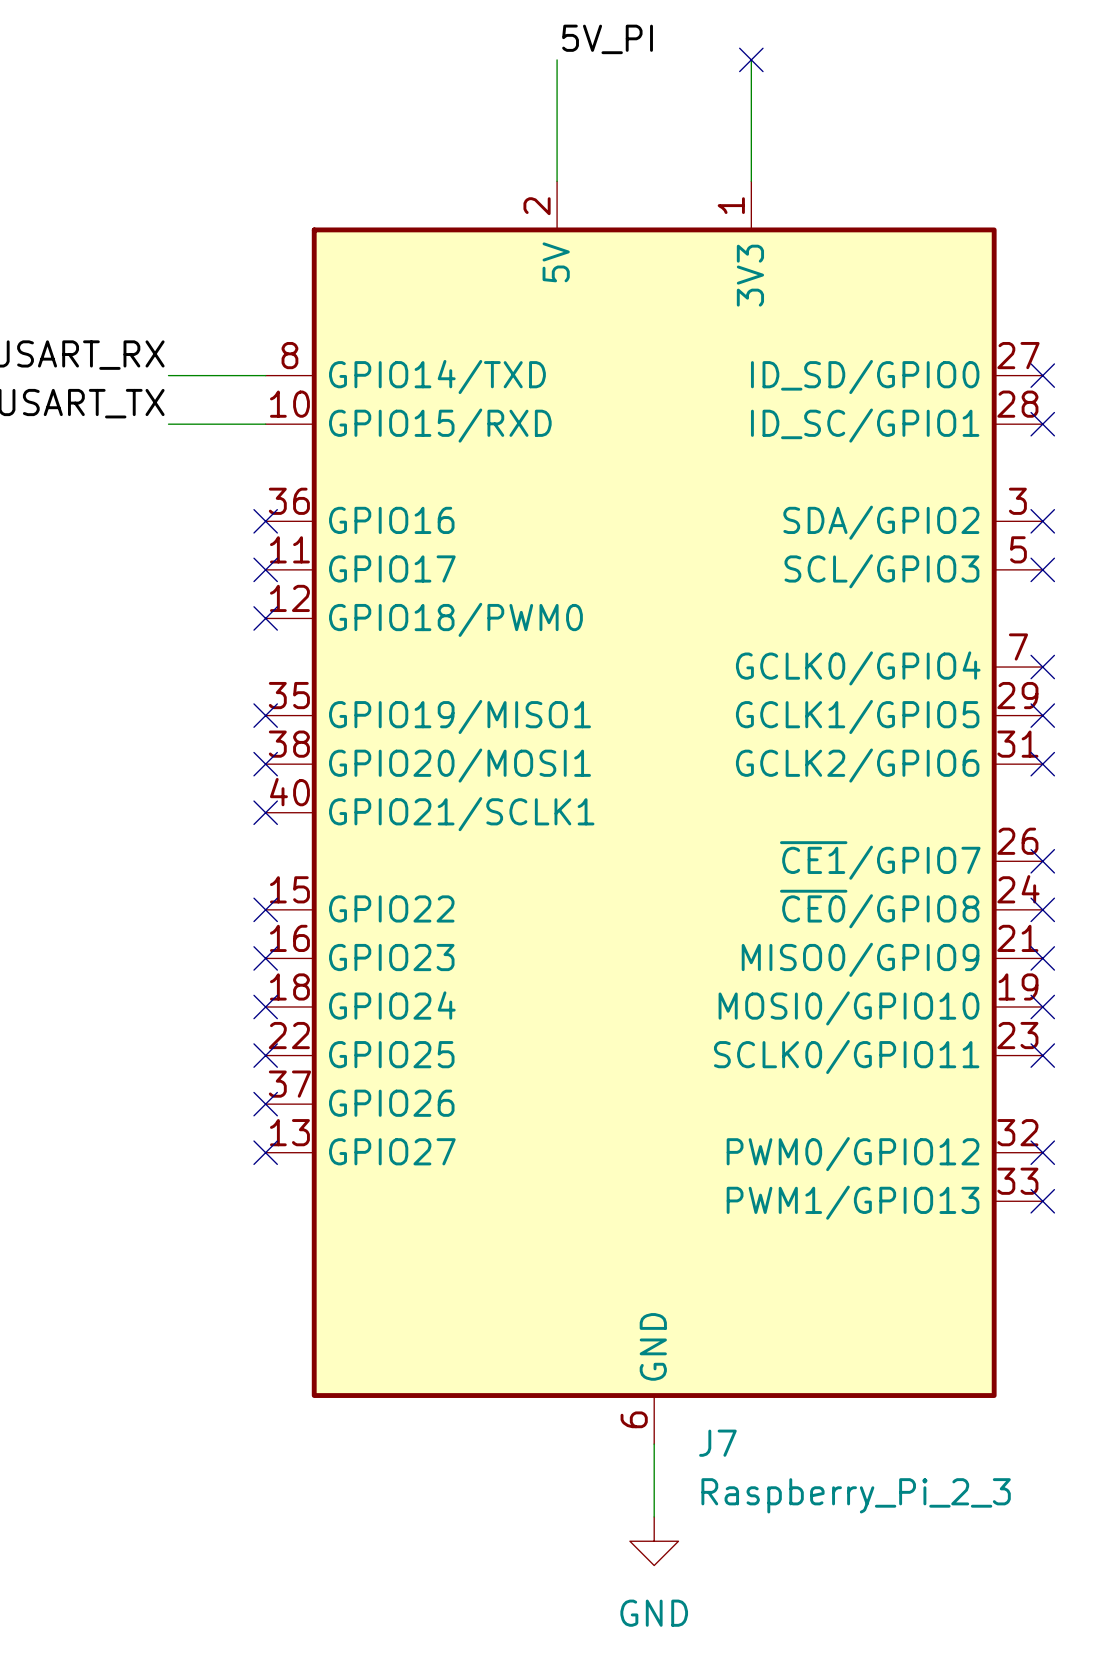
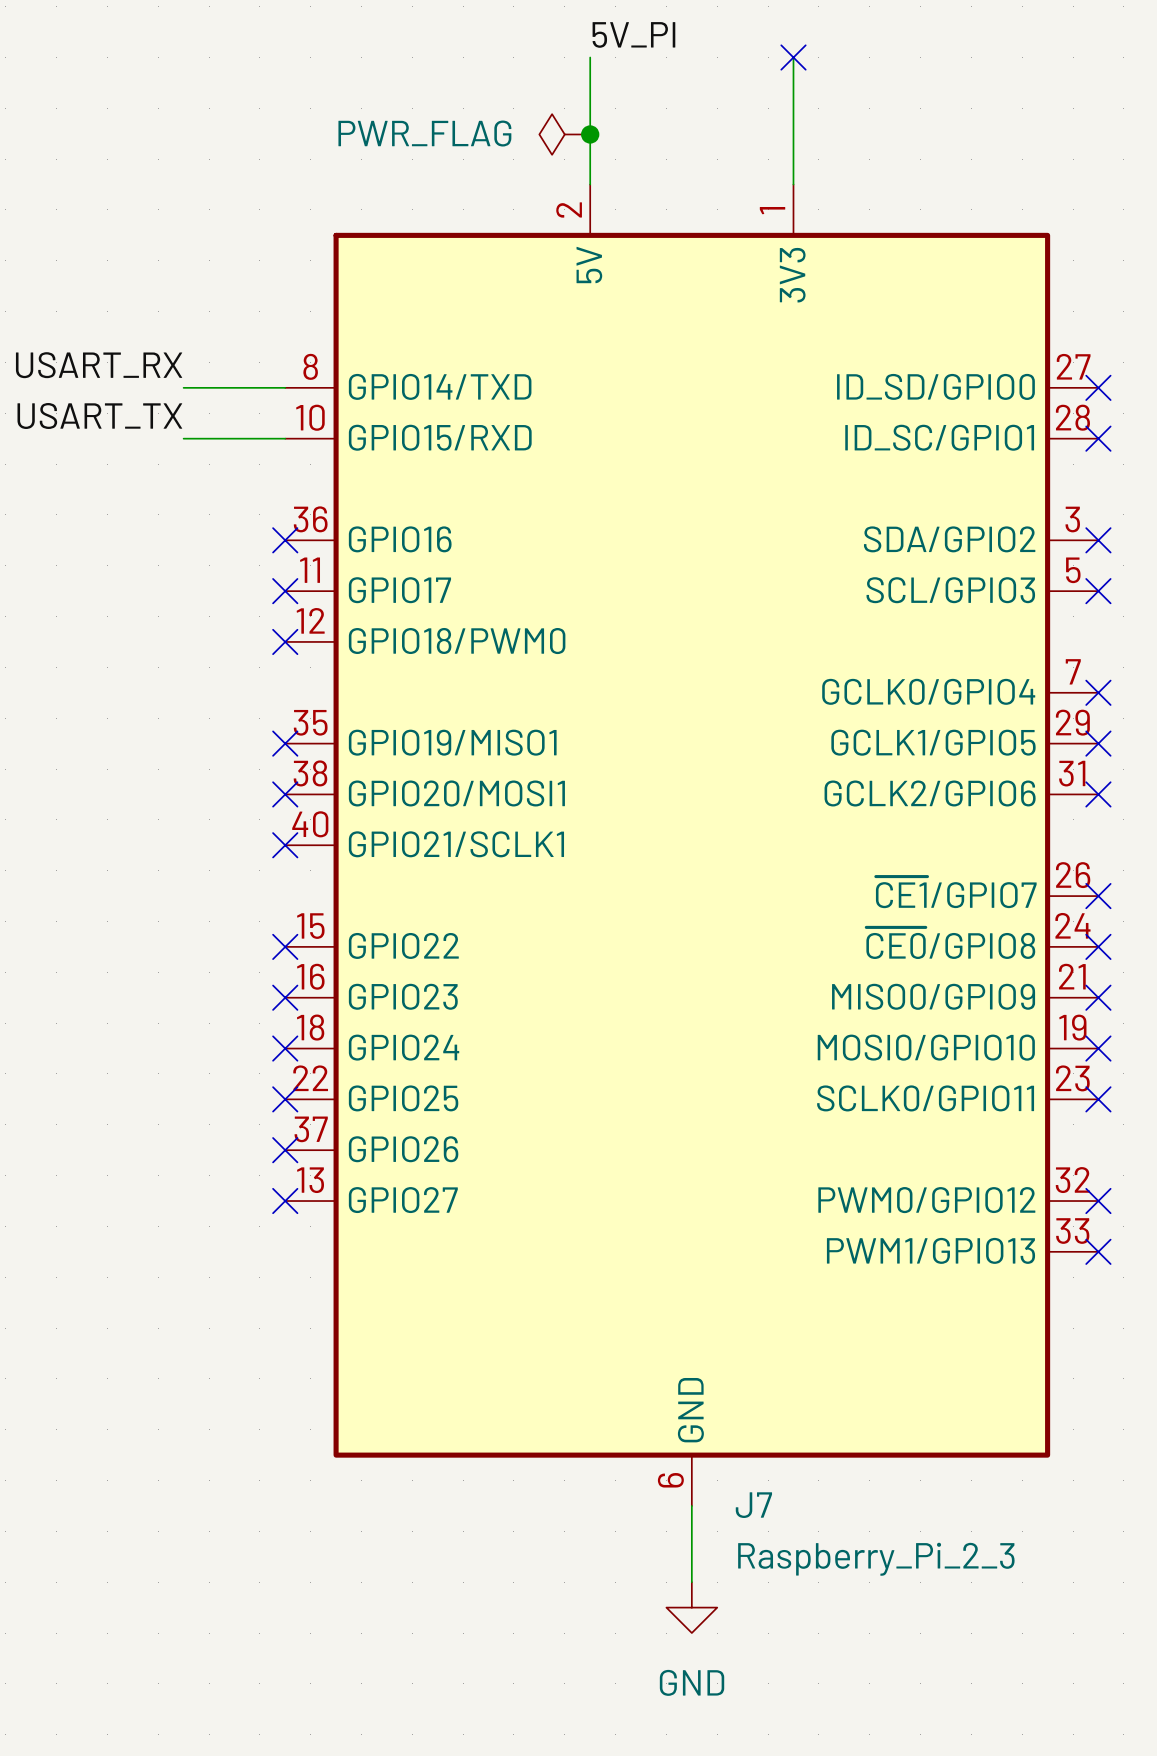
power symbol: none -> PWR_FLAG (564, 134)
junction: none -> (590, 134)

